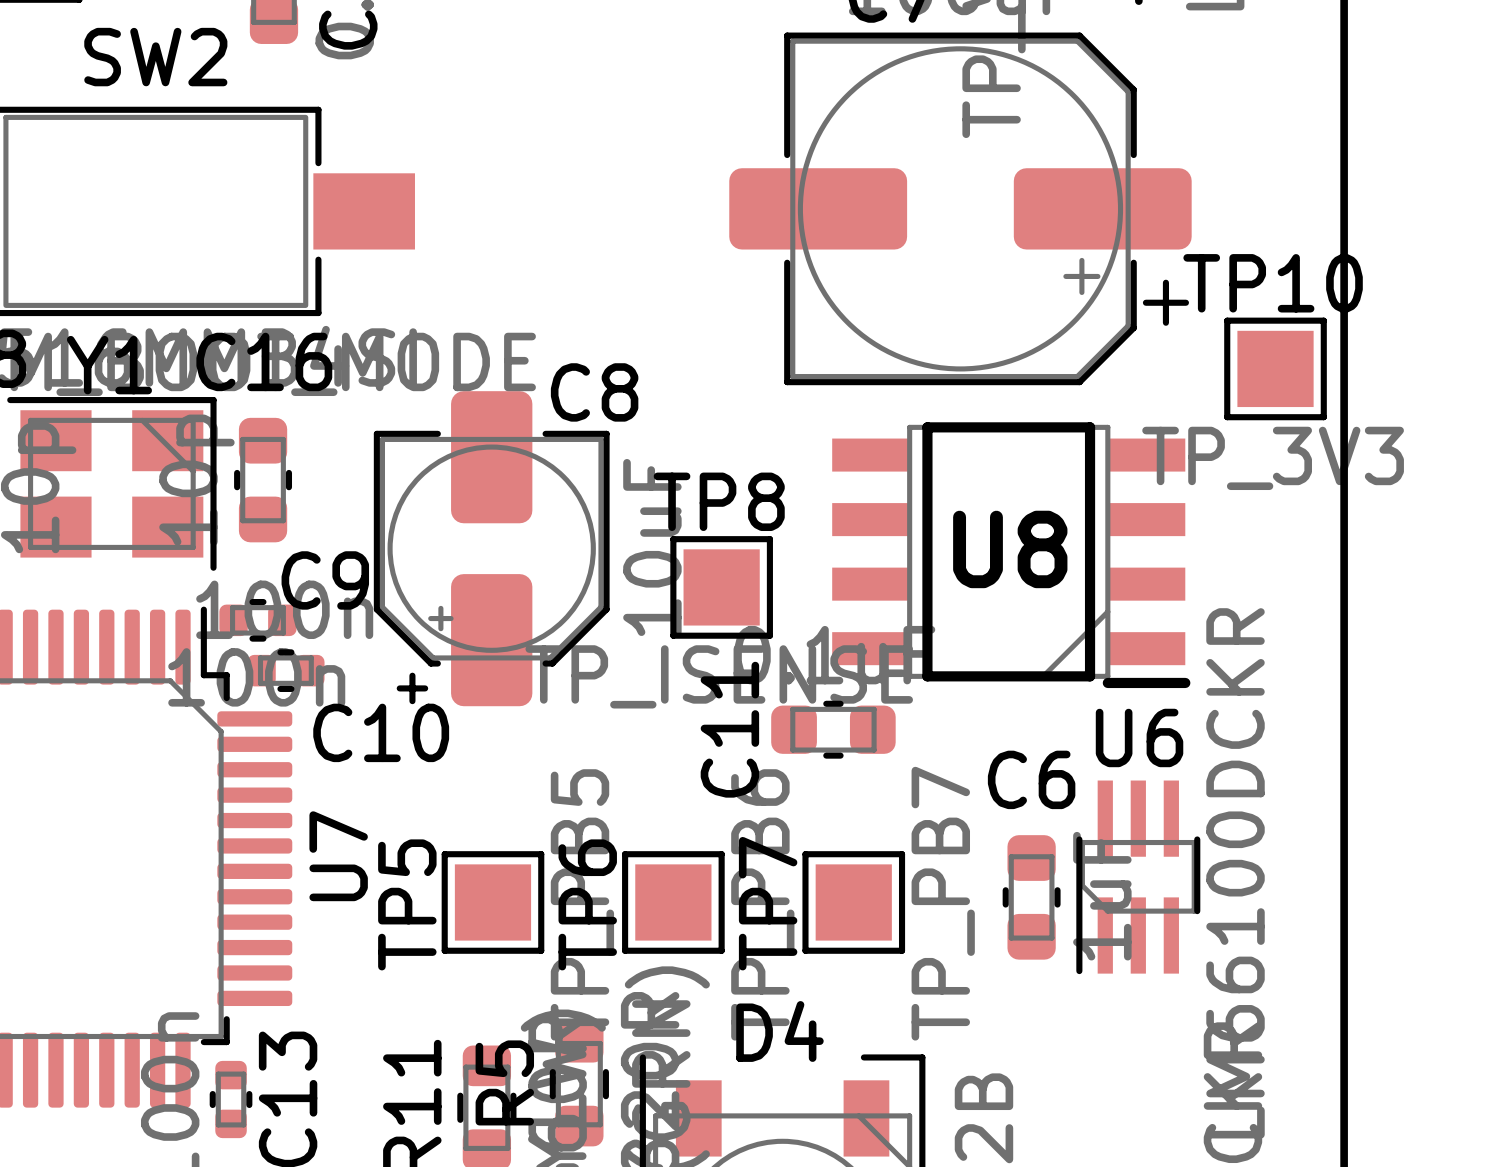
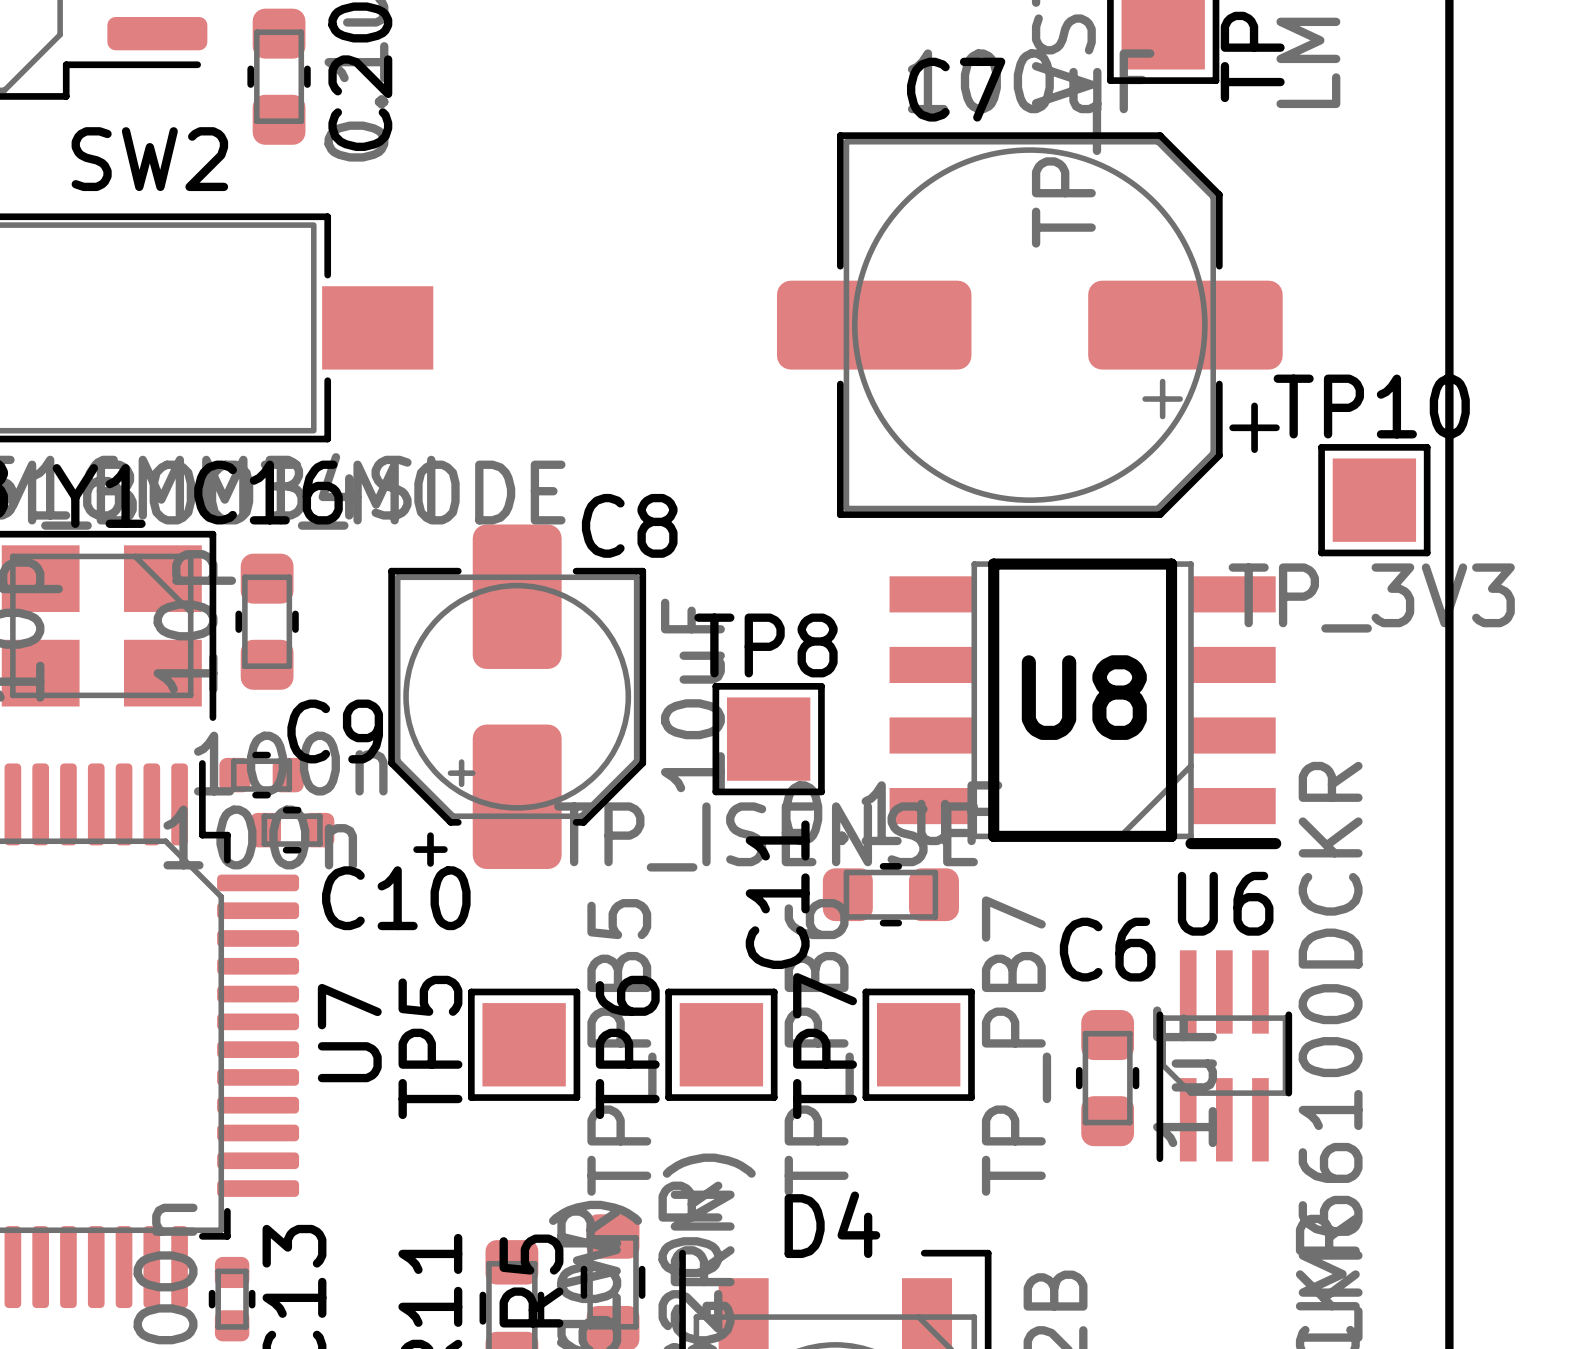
TP5 position: (492, 902) -> (524, 1044)
TP6 position: (673, 902) -> (721, 1044)
TP7 position: (853, 902) -> (918, 1044)

